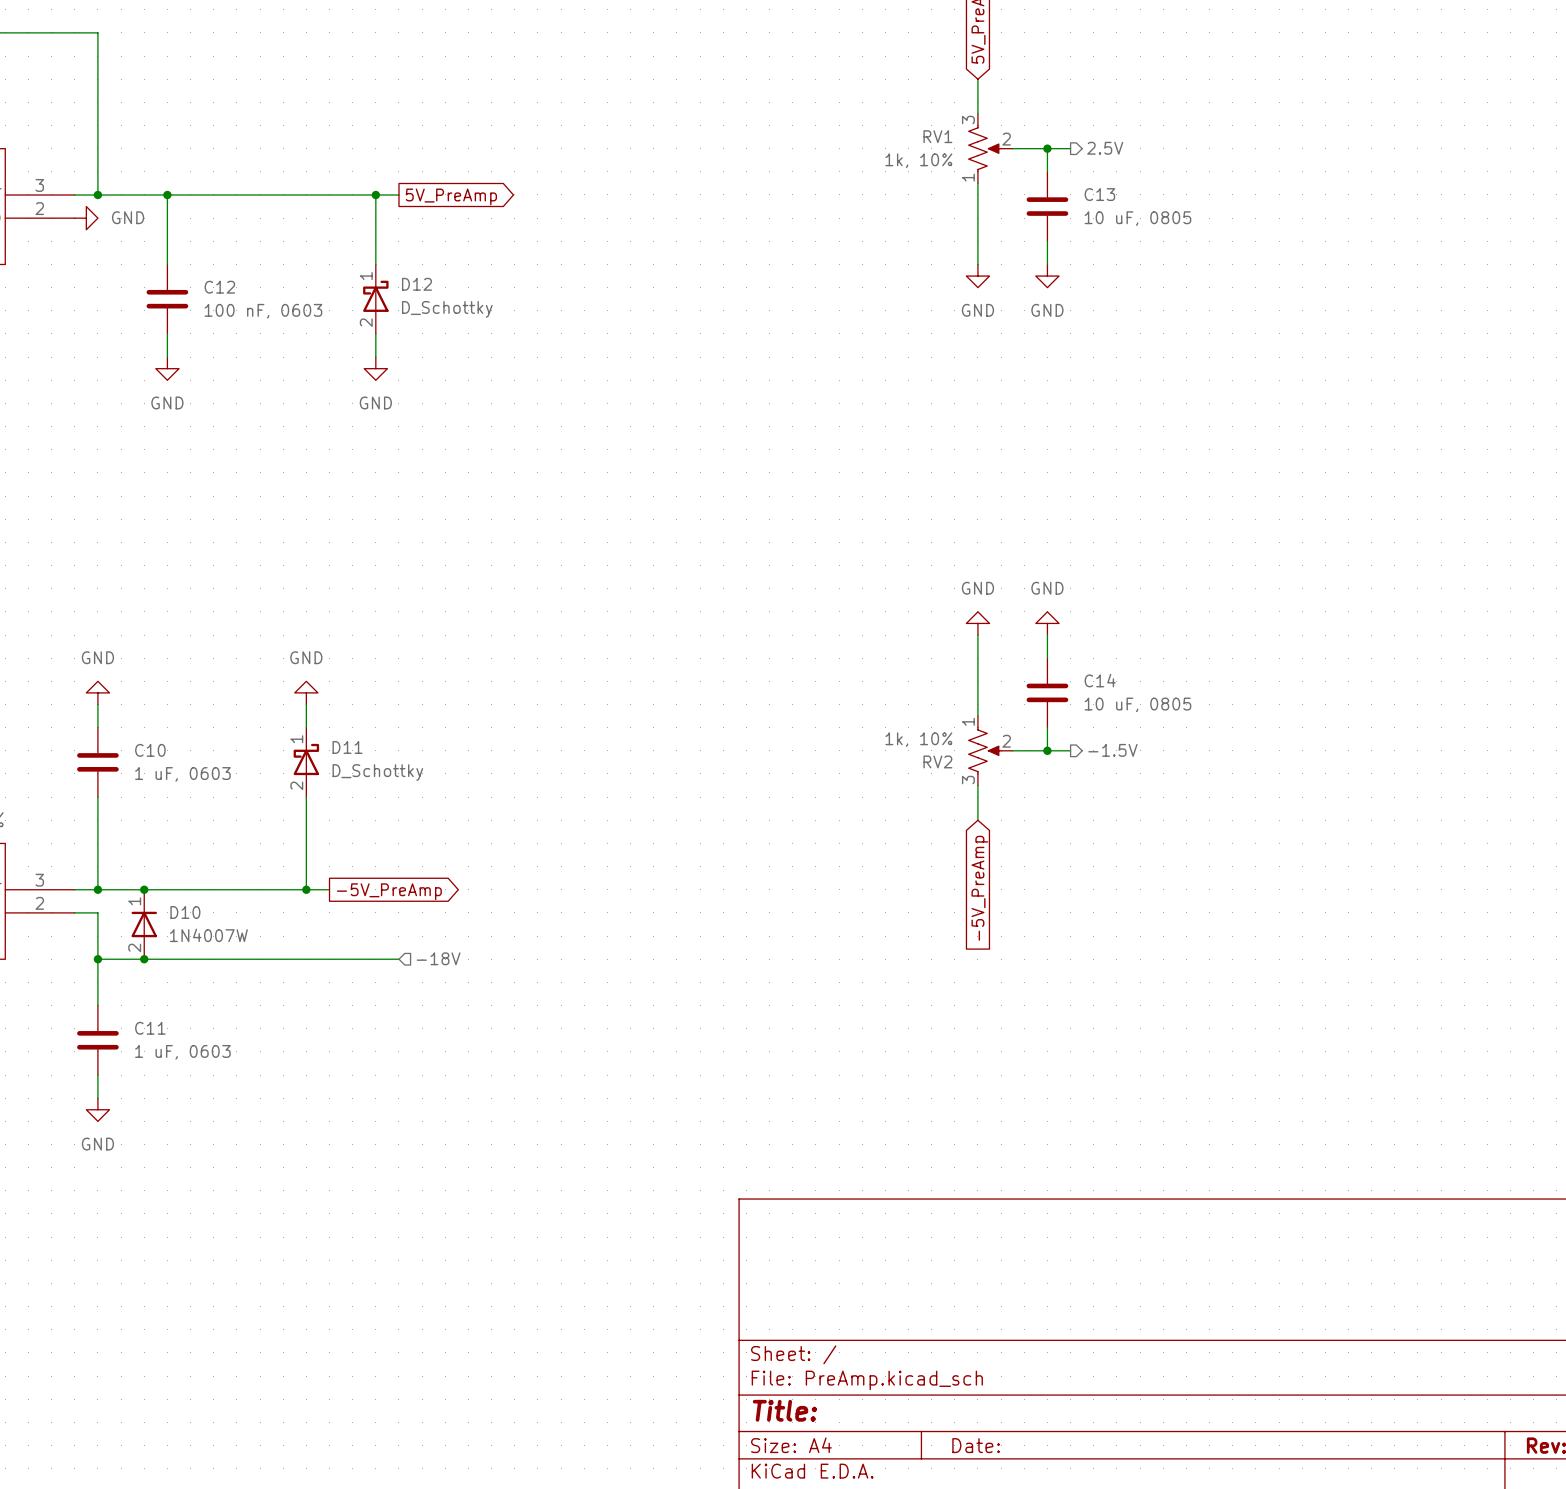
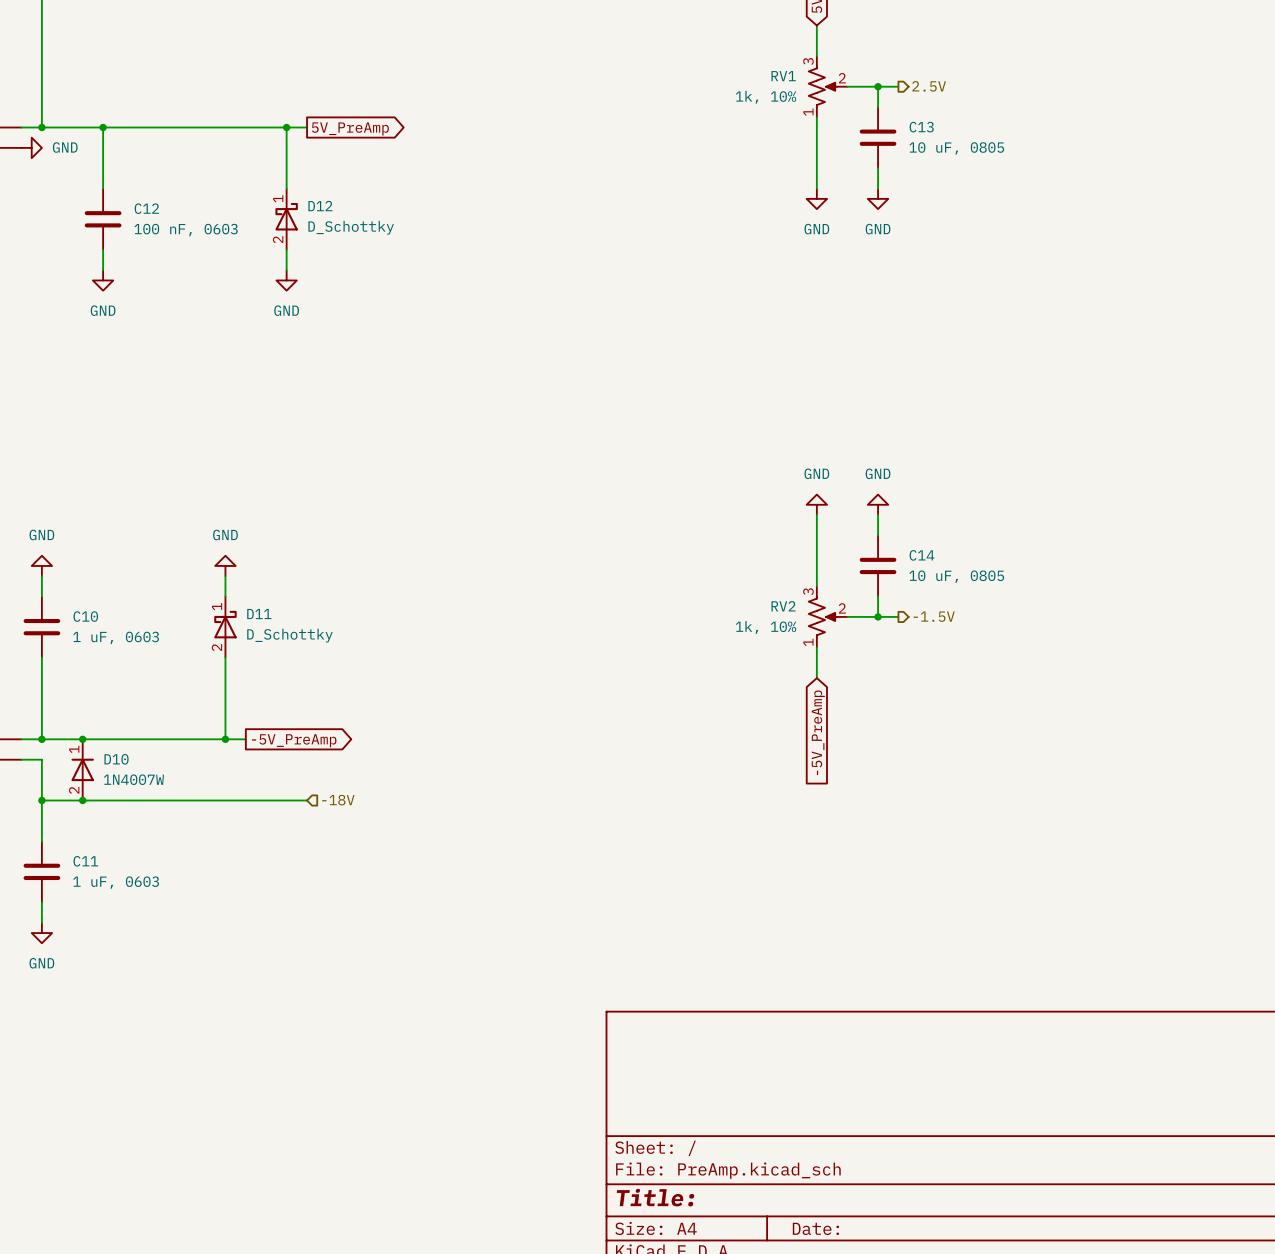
RV2 flip: as is (984, 750) -> up-down (822, 616)

